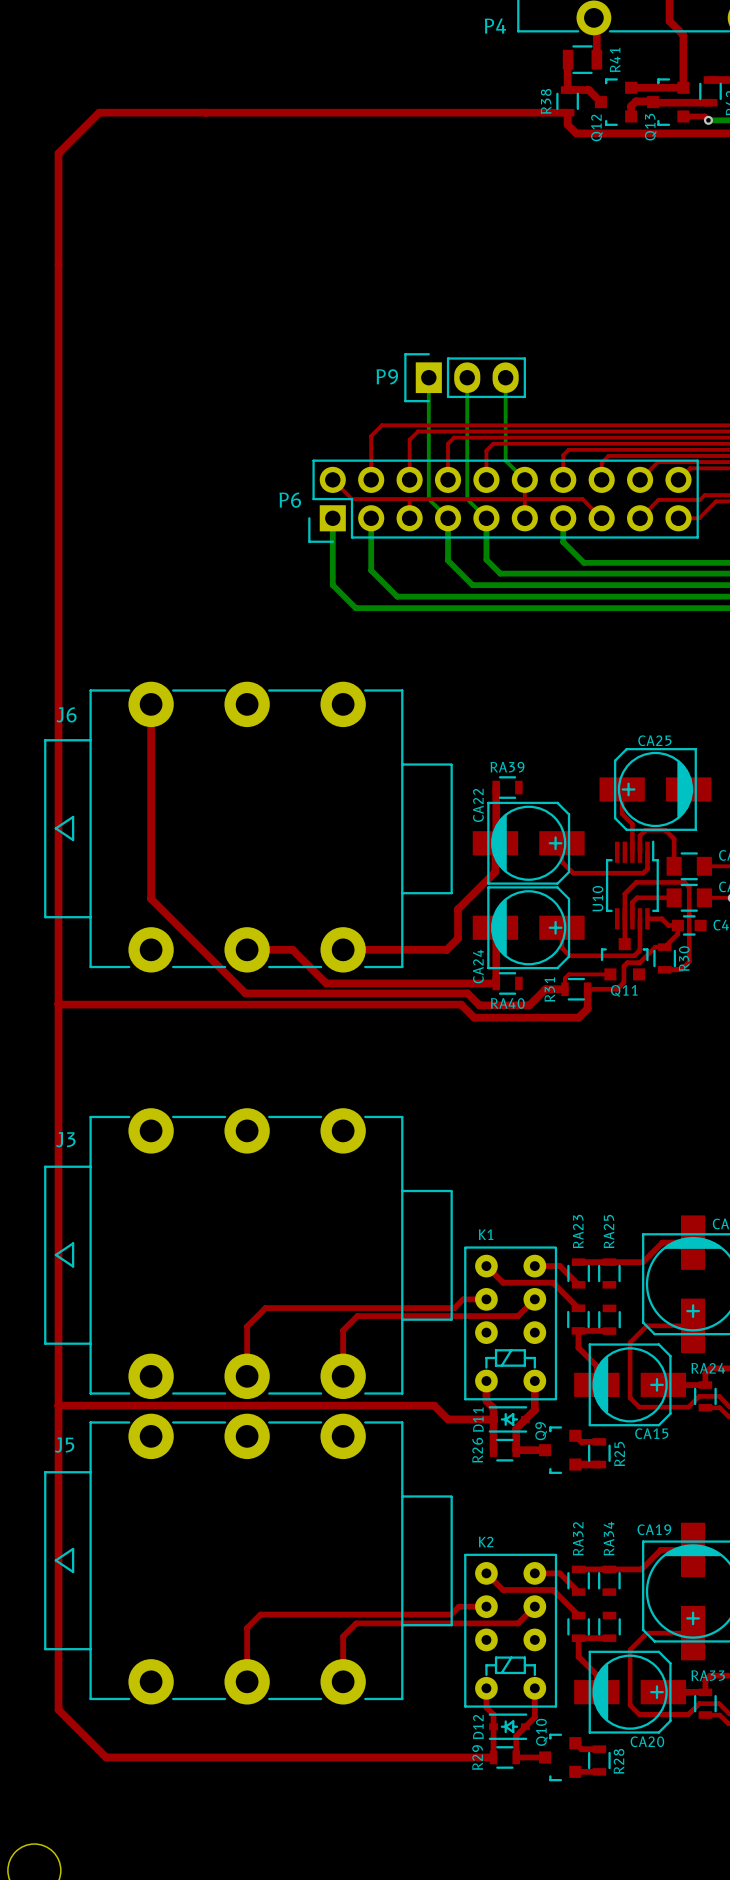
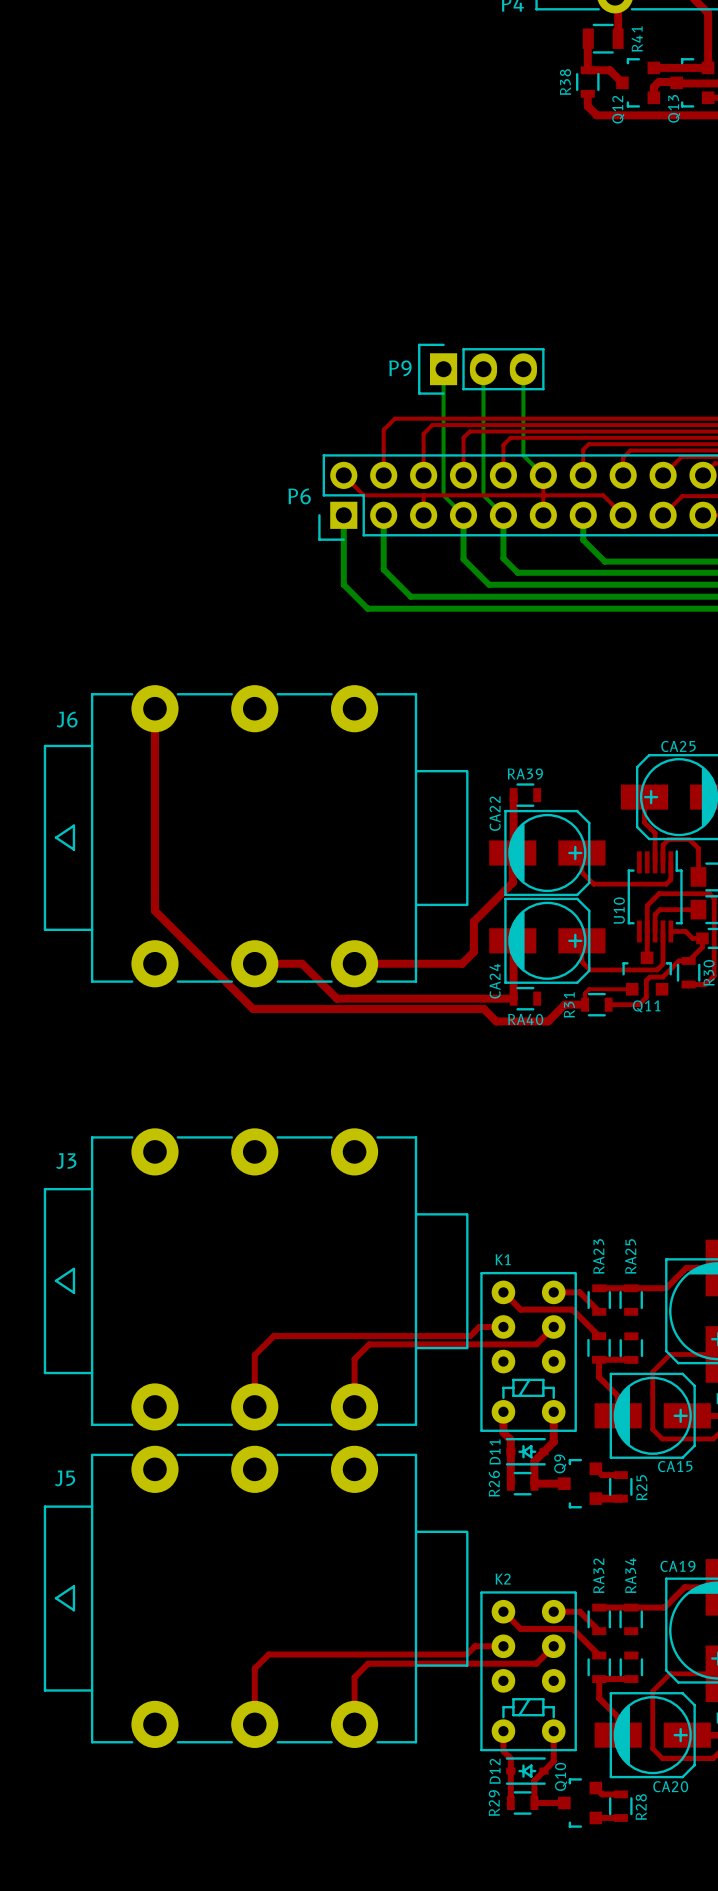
top track: (567, 112) (99, 112) (58, 153) (58, 1709) (106, 1757) (493, 1757) -> none
top track: (587, 989) (587, 1008) (578, 1017) (474, 1017) (461, 1004) (59, 1003) -> none
top track: (58, 1405) (434, 1405) (448, 1419) (493, 1419) -> none

